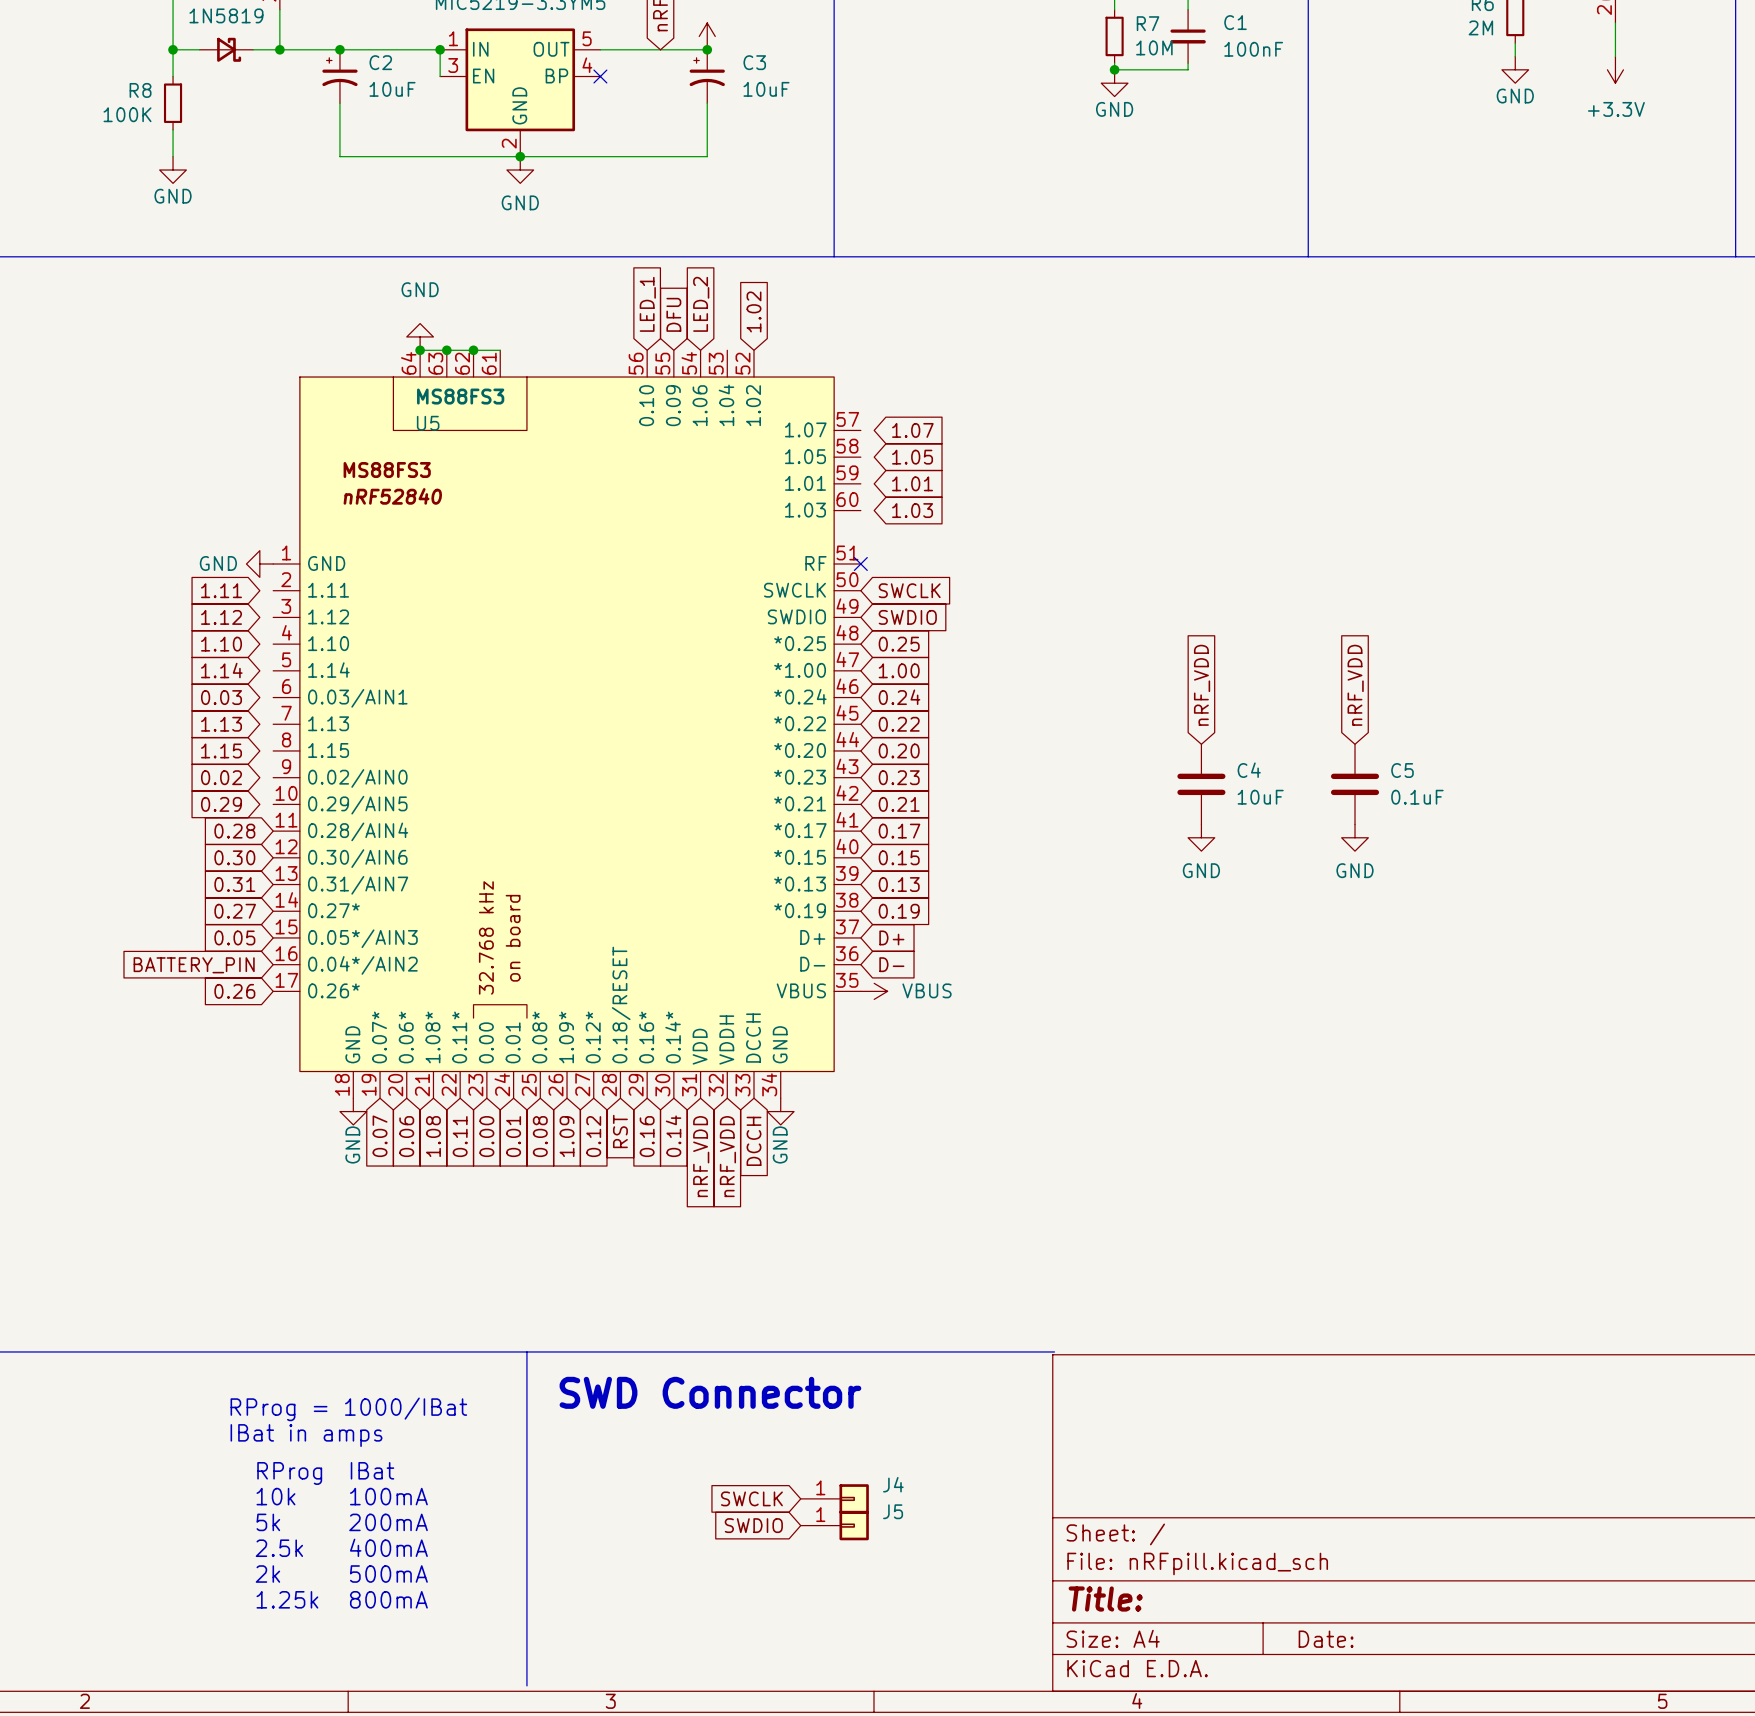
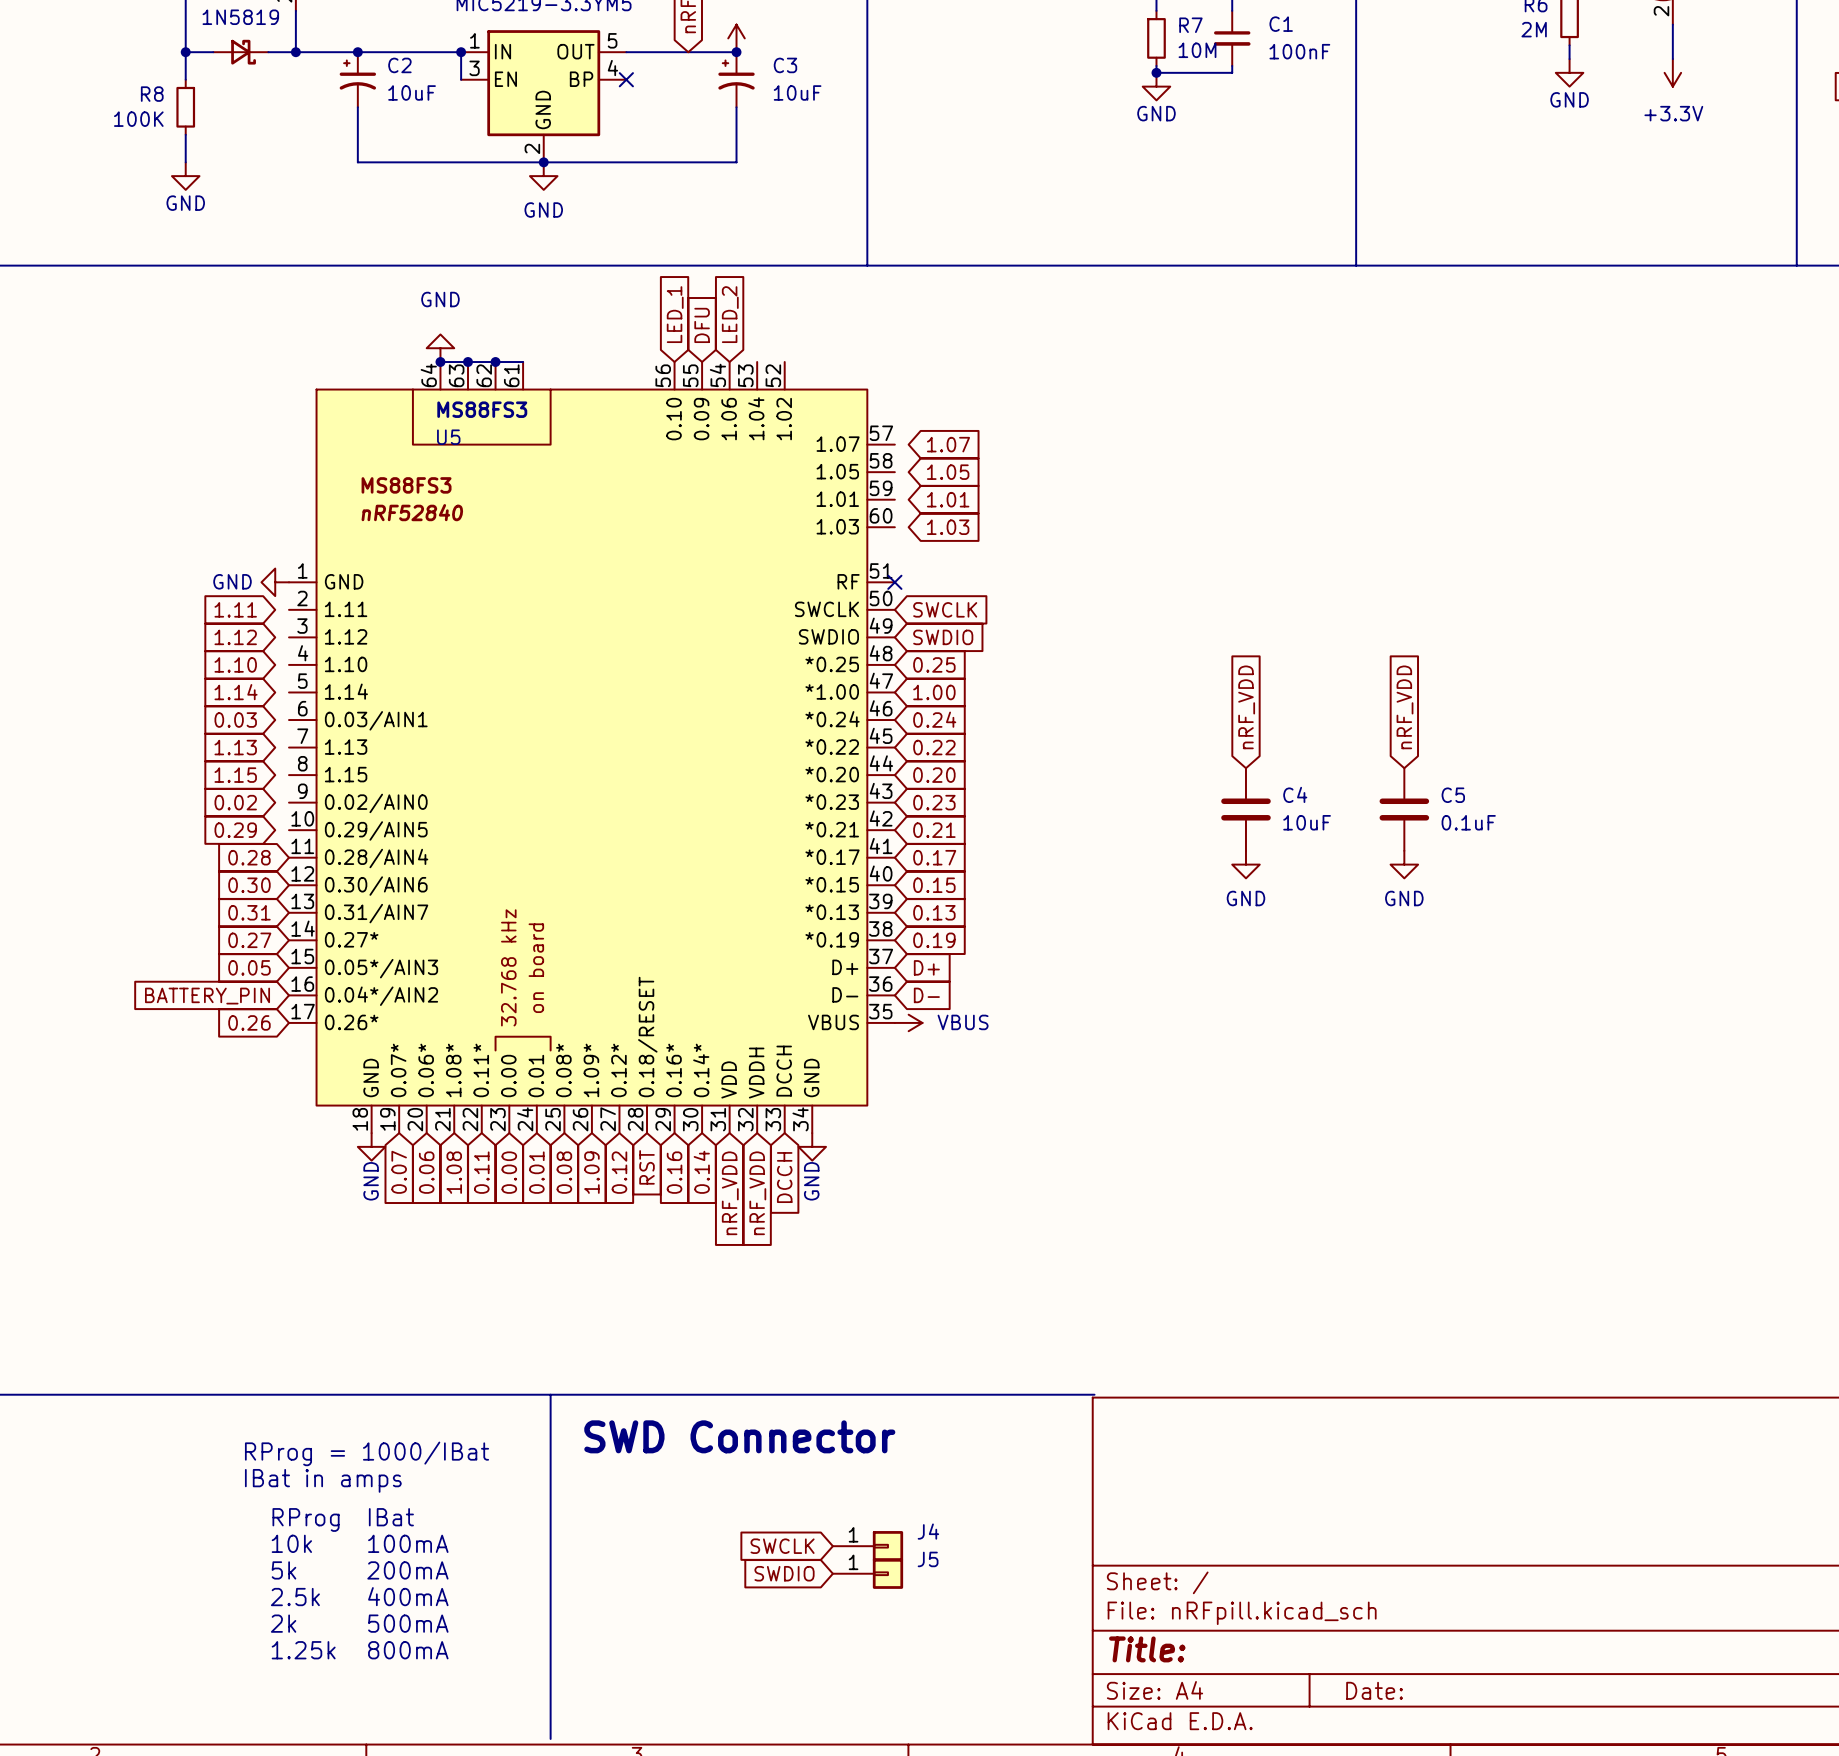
global label: 1.02 (754, 311) -> none

